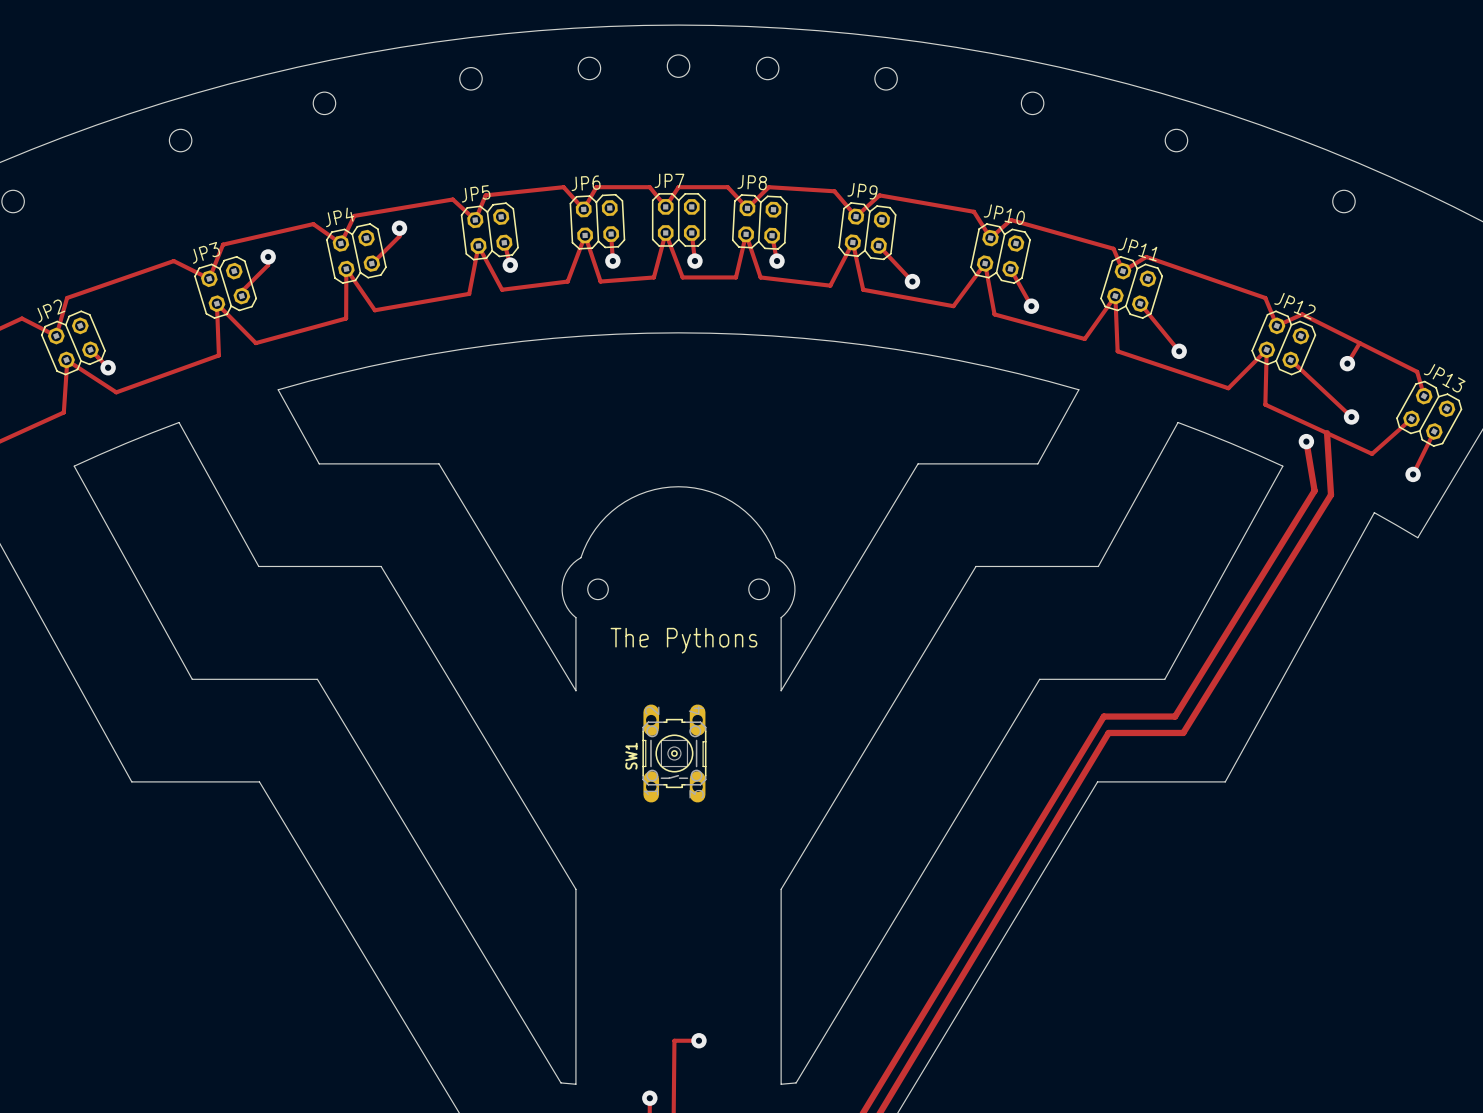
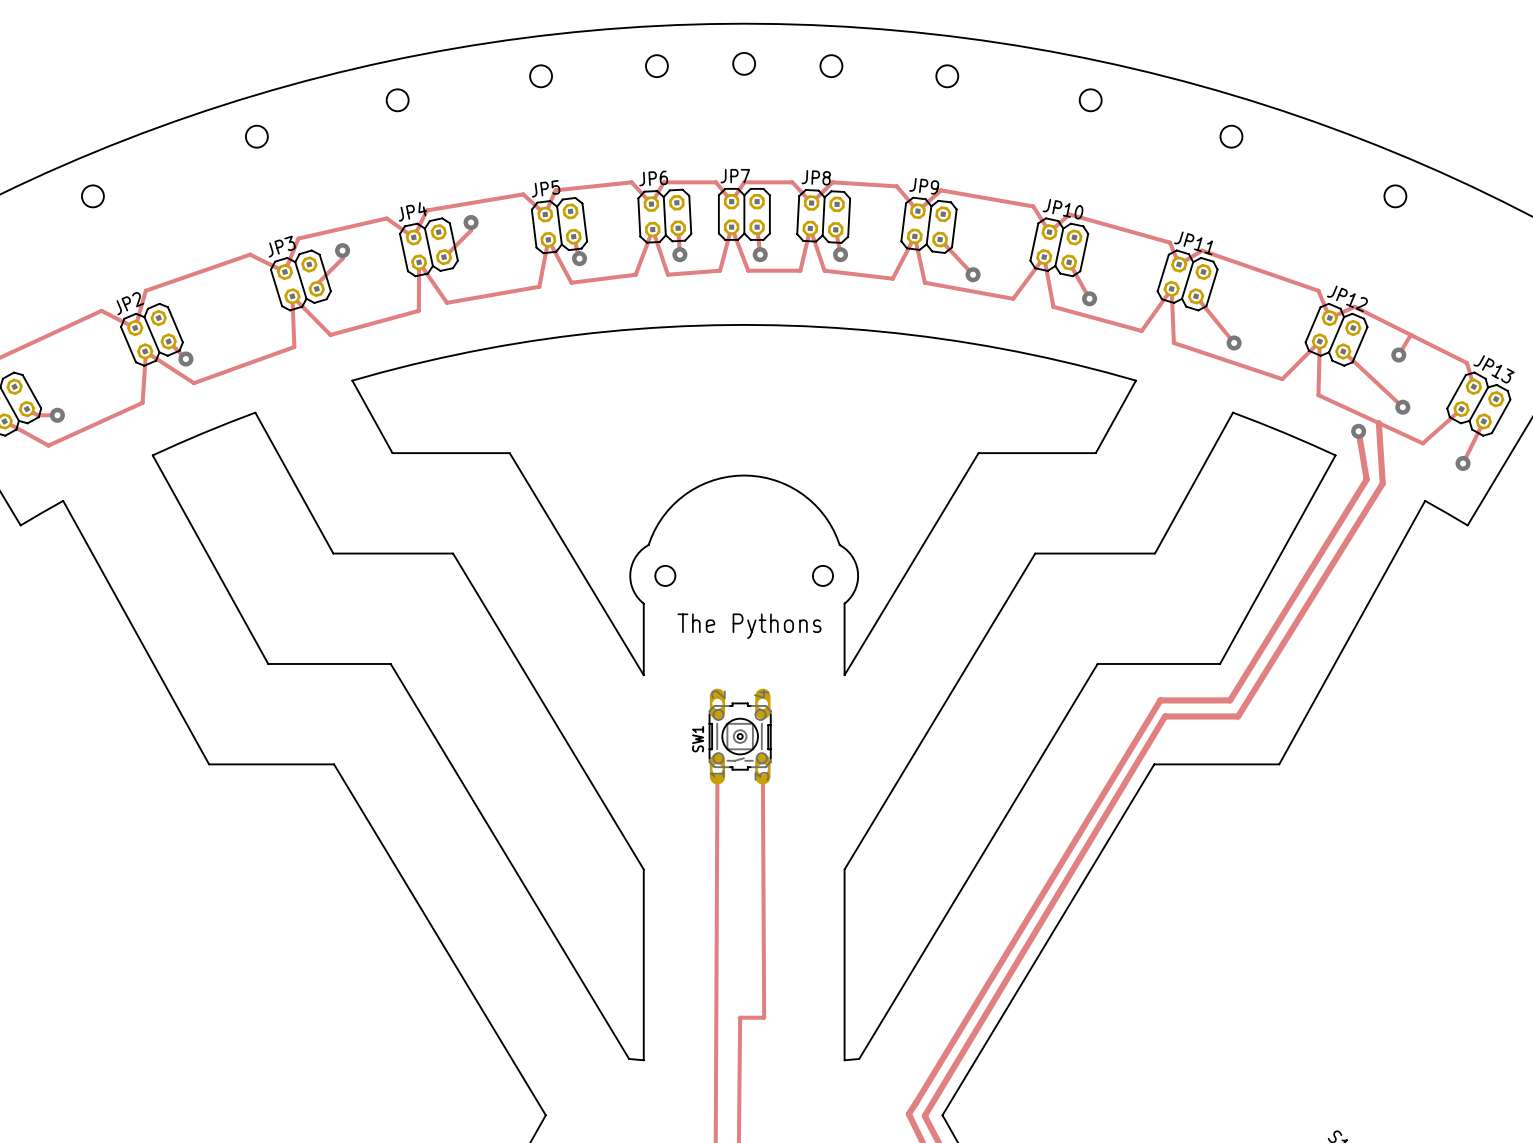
track: none -> (717, 769) (716, 1073)
track: none -> (762, 769) (764, 1017)
via: (698, 1040) -> none
via: (649, 1098) -> none

